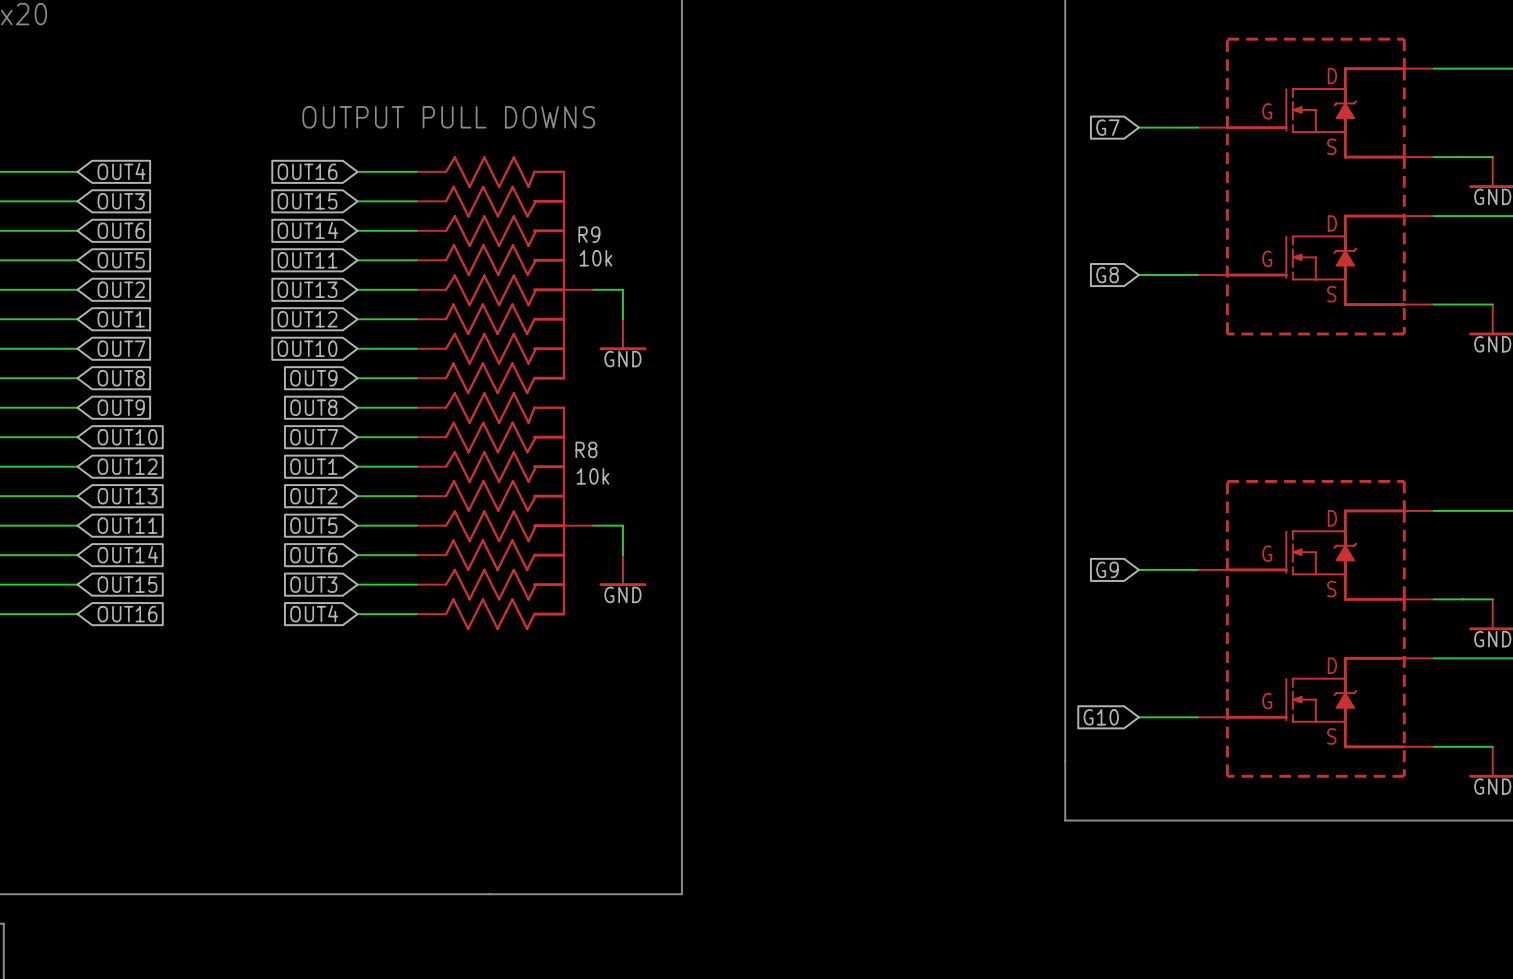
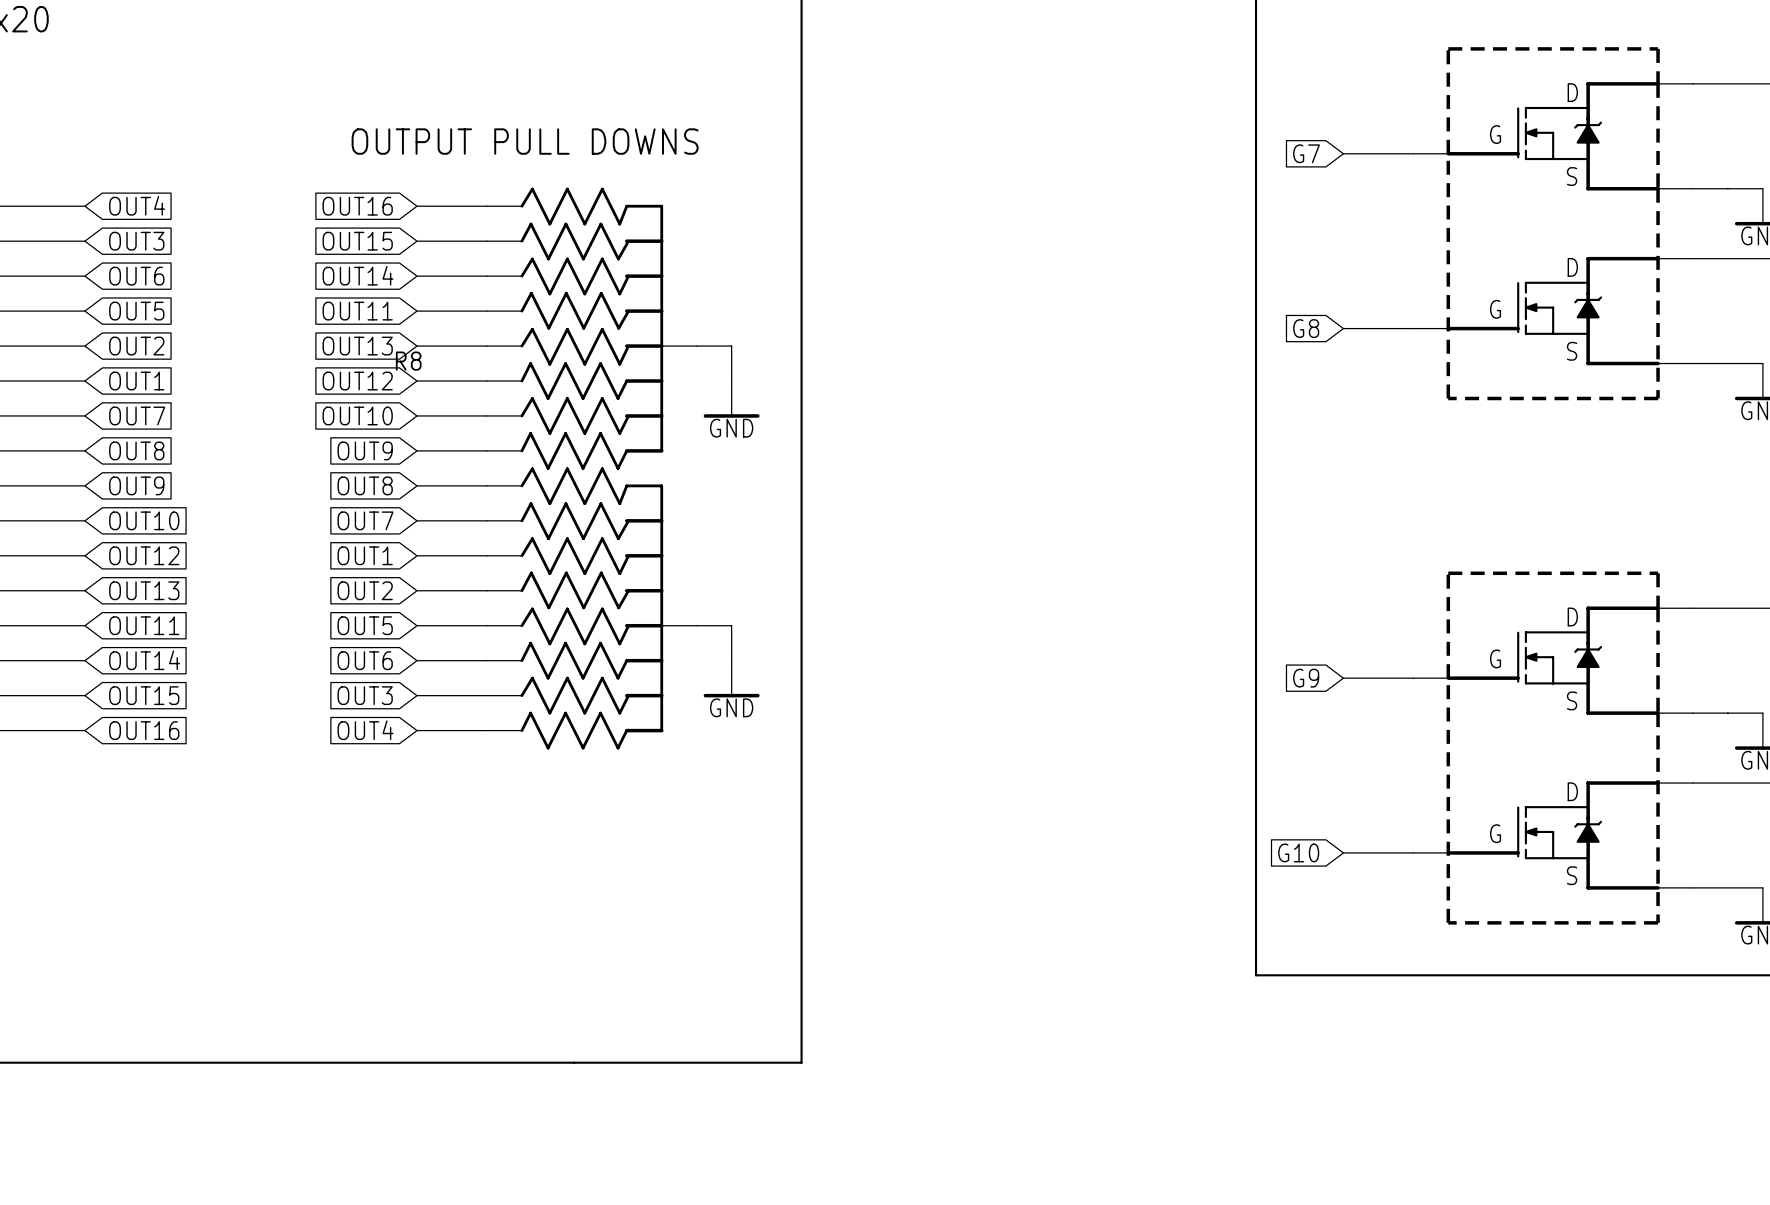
R9 name: R9 (589, 234) -> none
R9 value: 10k (595, 258) -> none
R8 name position: R8 (586, 449) -> R8 (408, 361)
R8 value: 10k (592, 476) -> none

